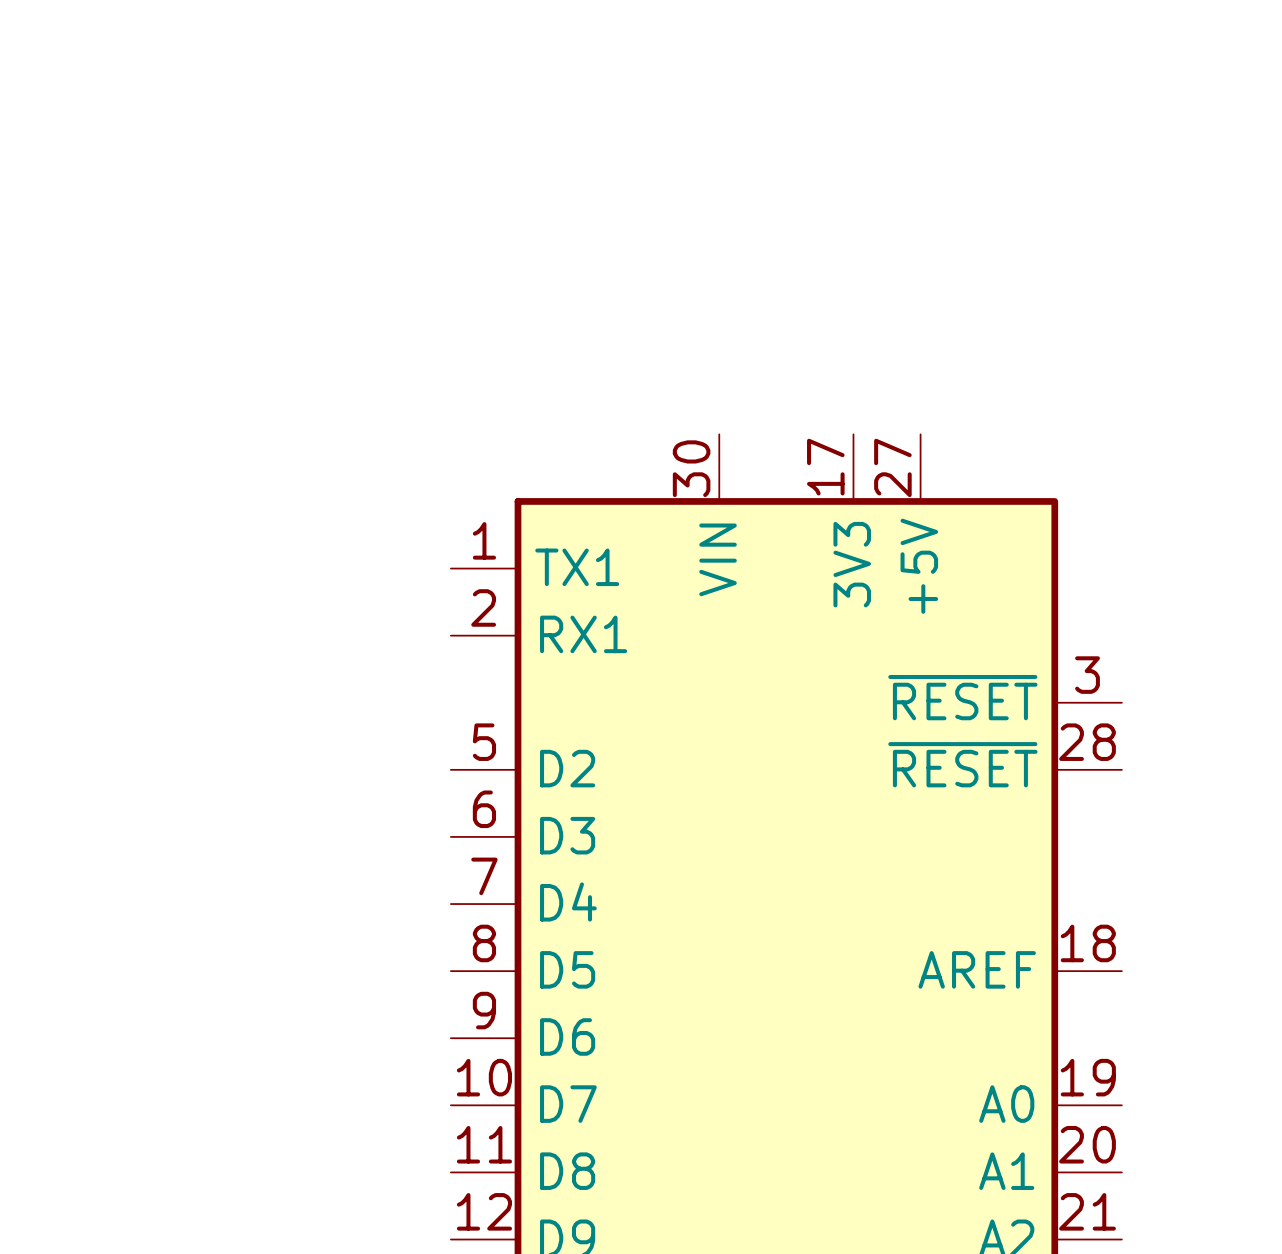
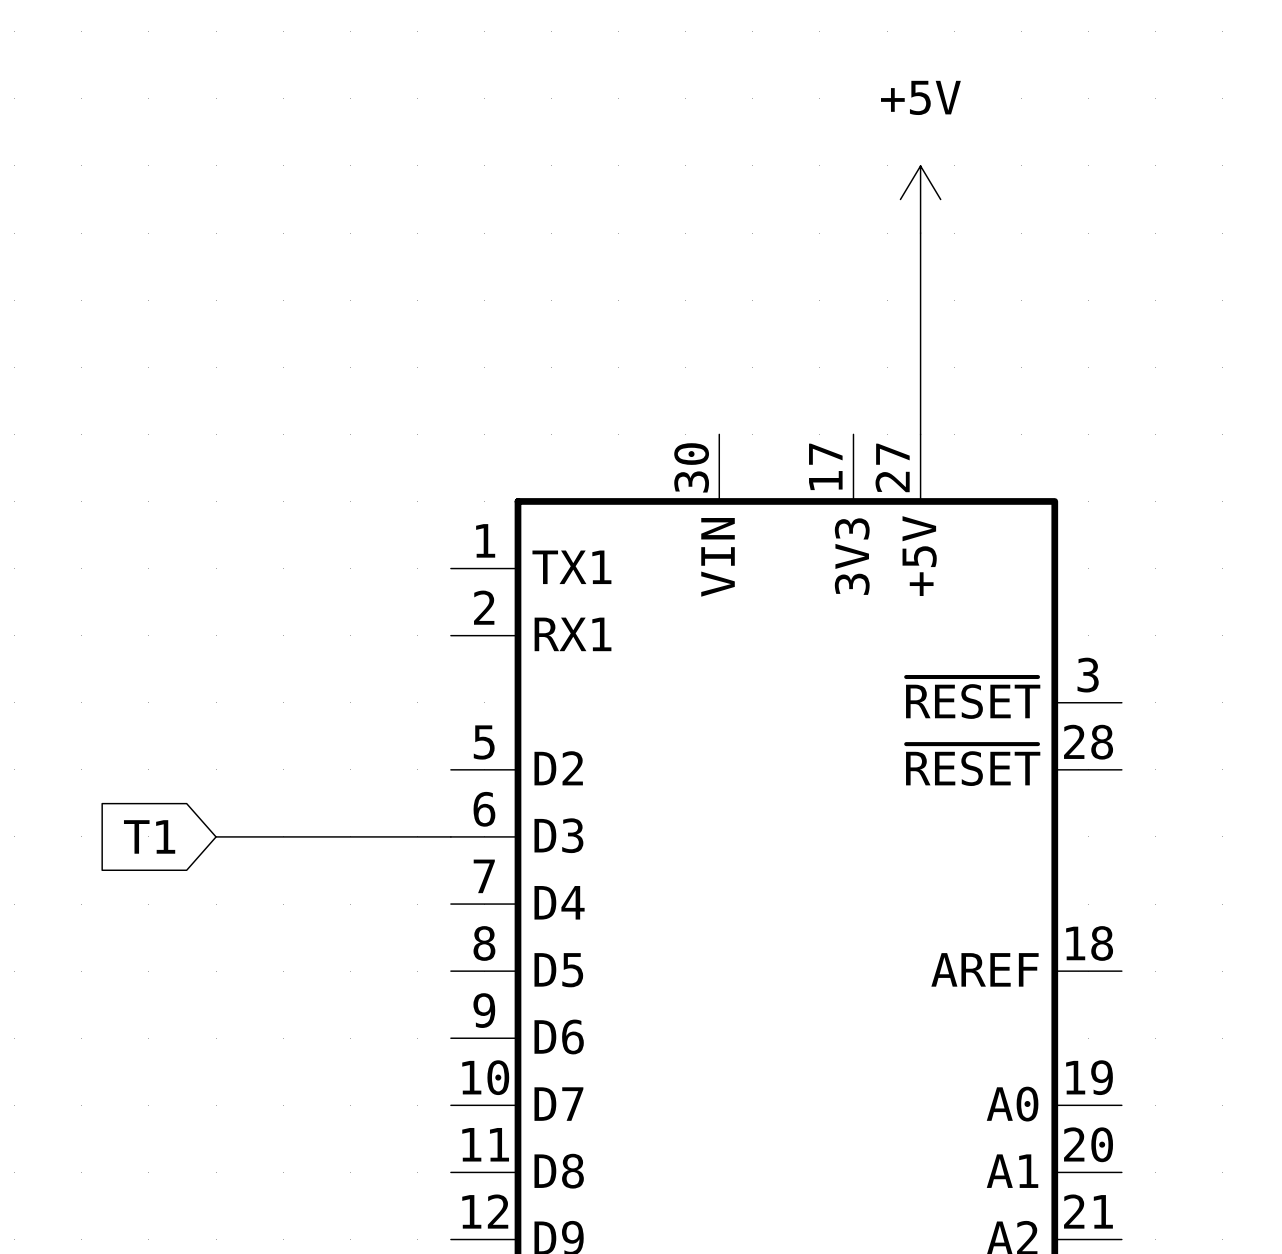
power symbol: none -> +5V (920, 199)
wire: none -> (920, 233) (920, 434)
global label: none -> T1 (149, 836)
wire: none -> (216, 836) (450, 836)

